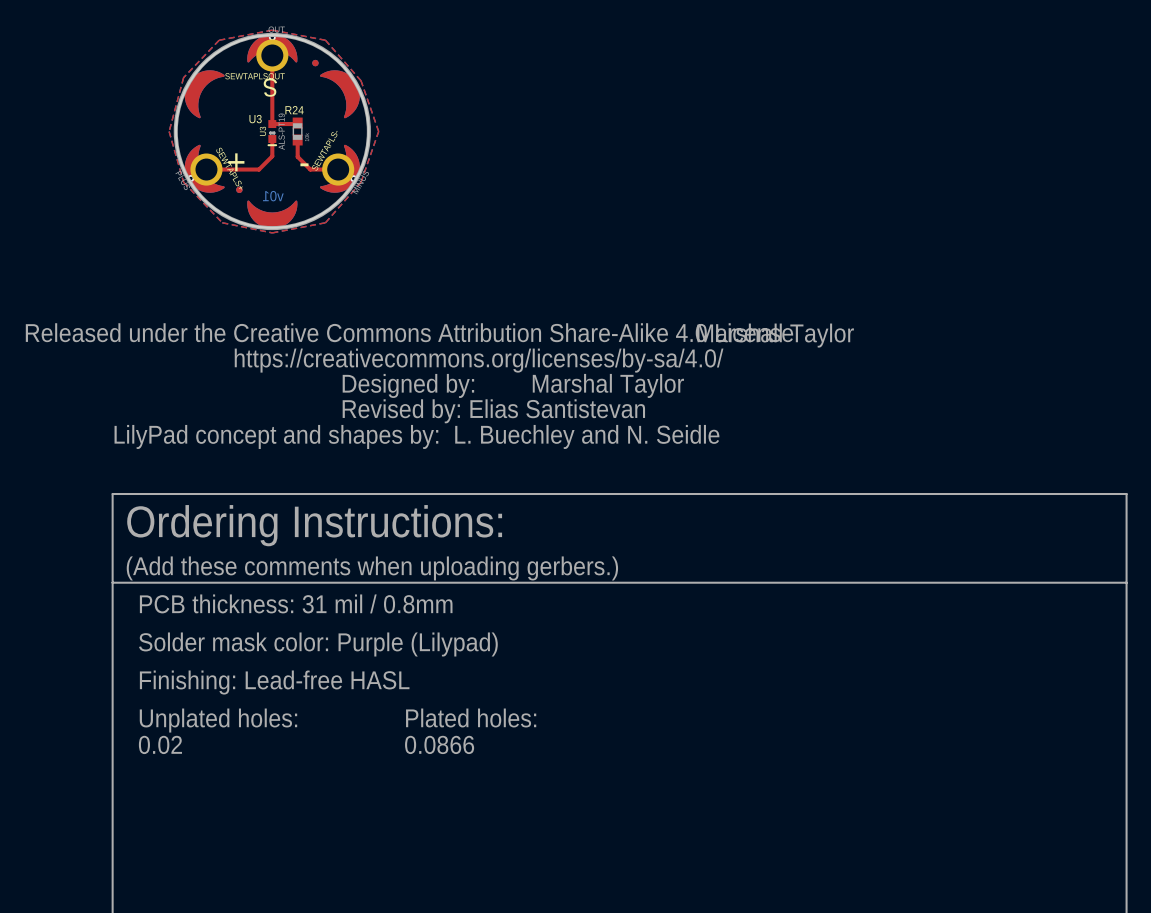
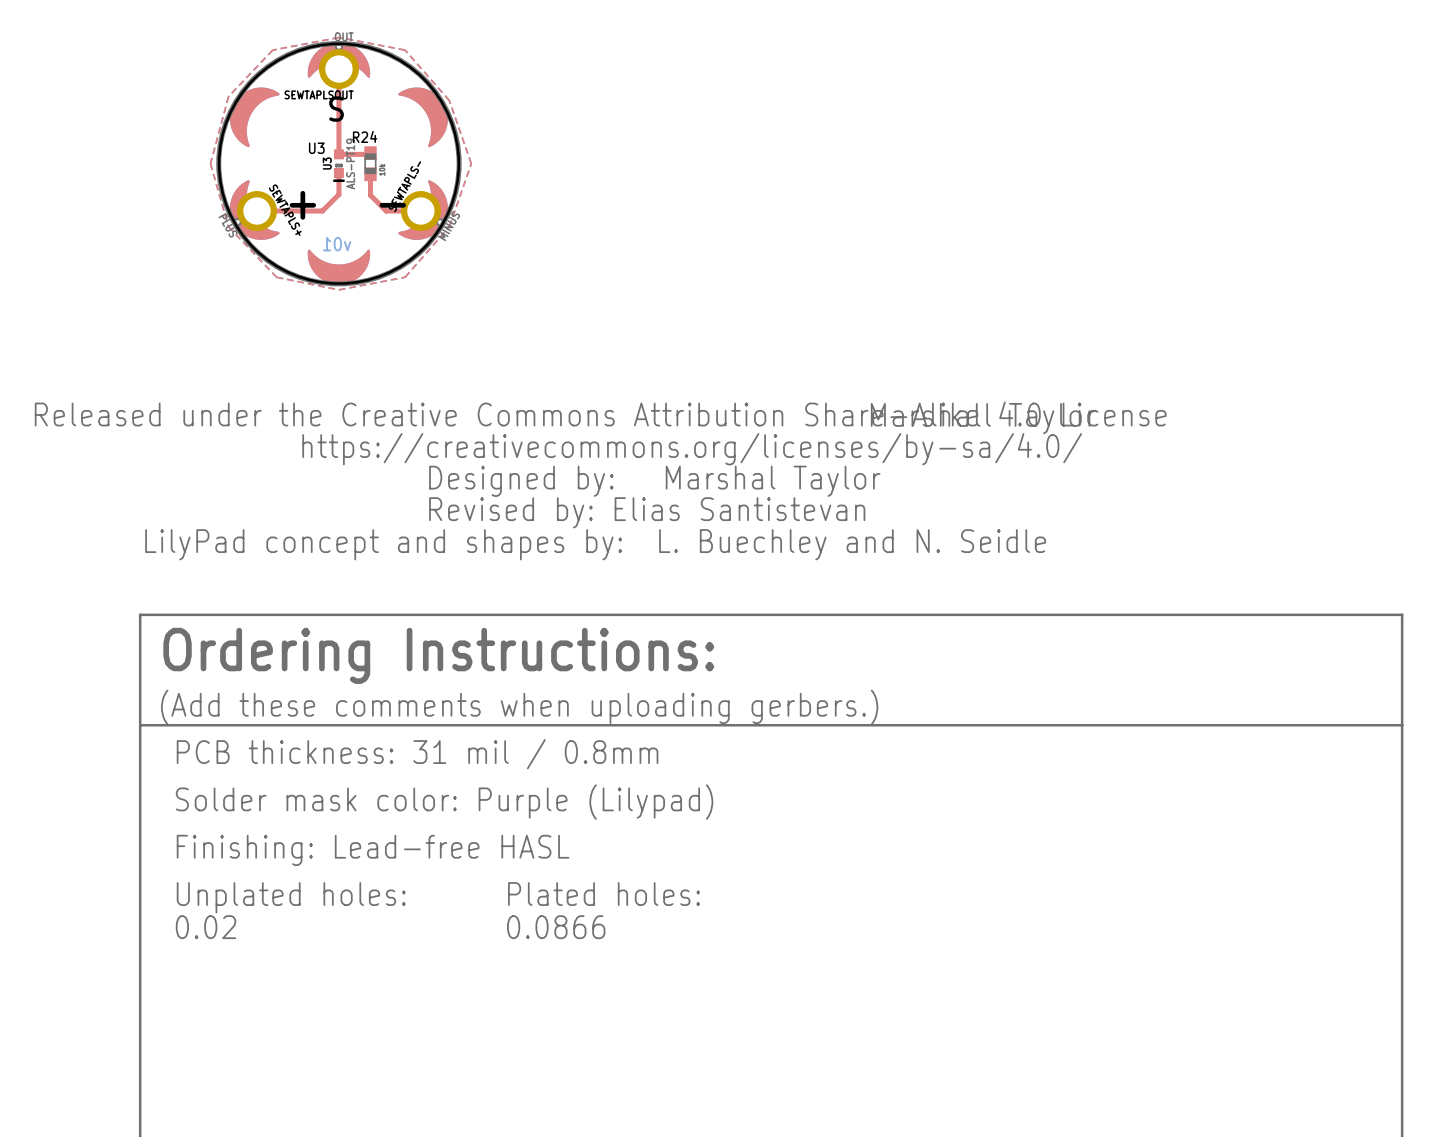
part: (315, 63) -> none
part: (239, 189) -> none

